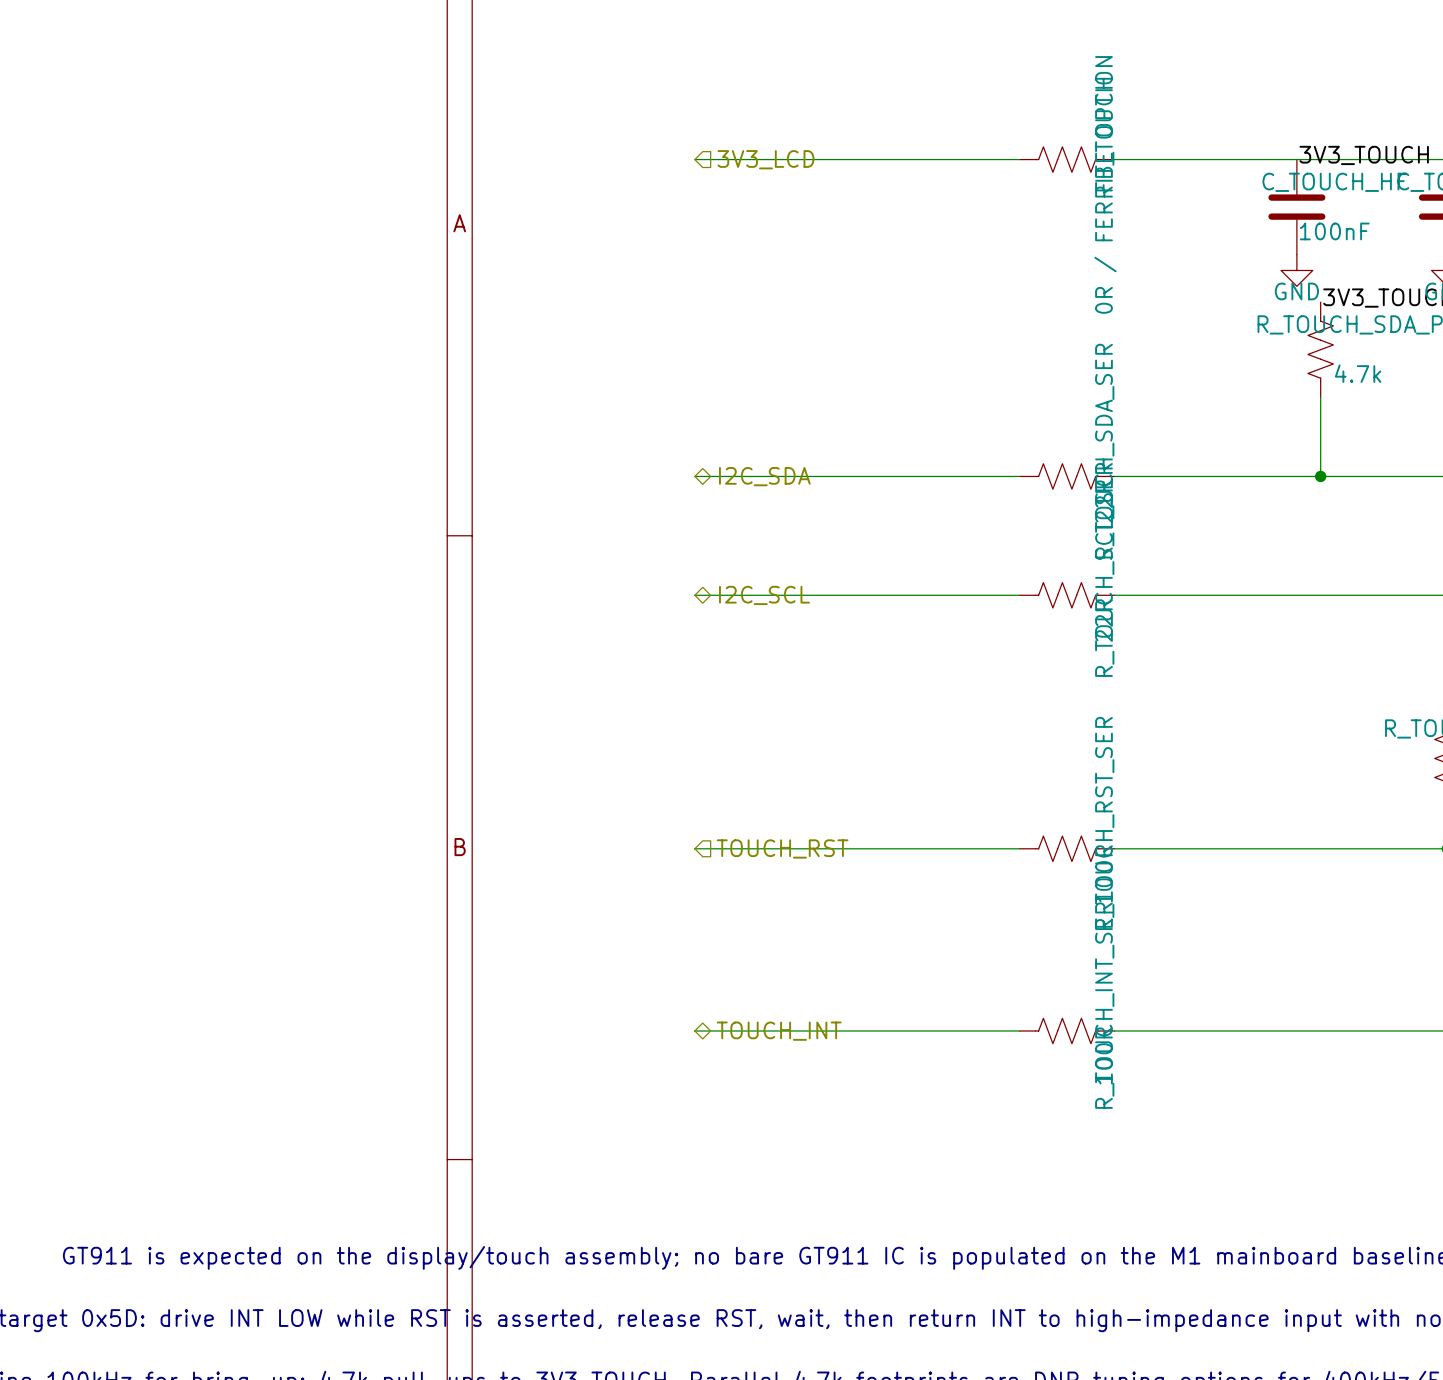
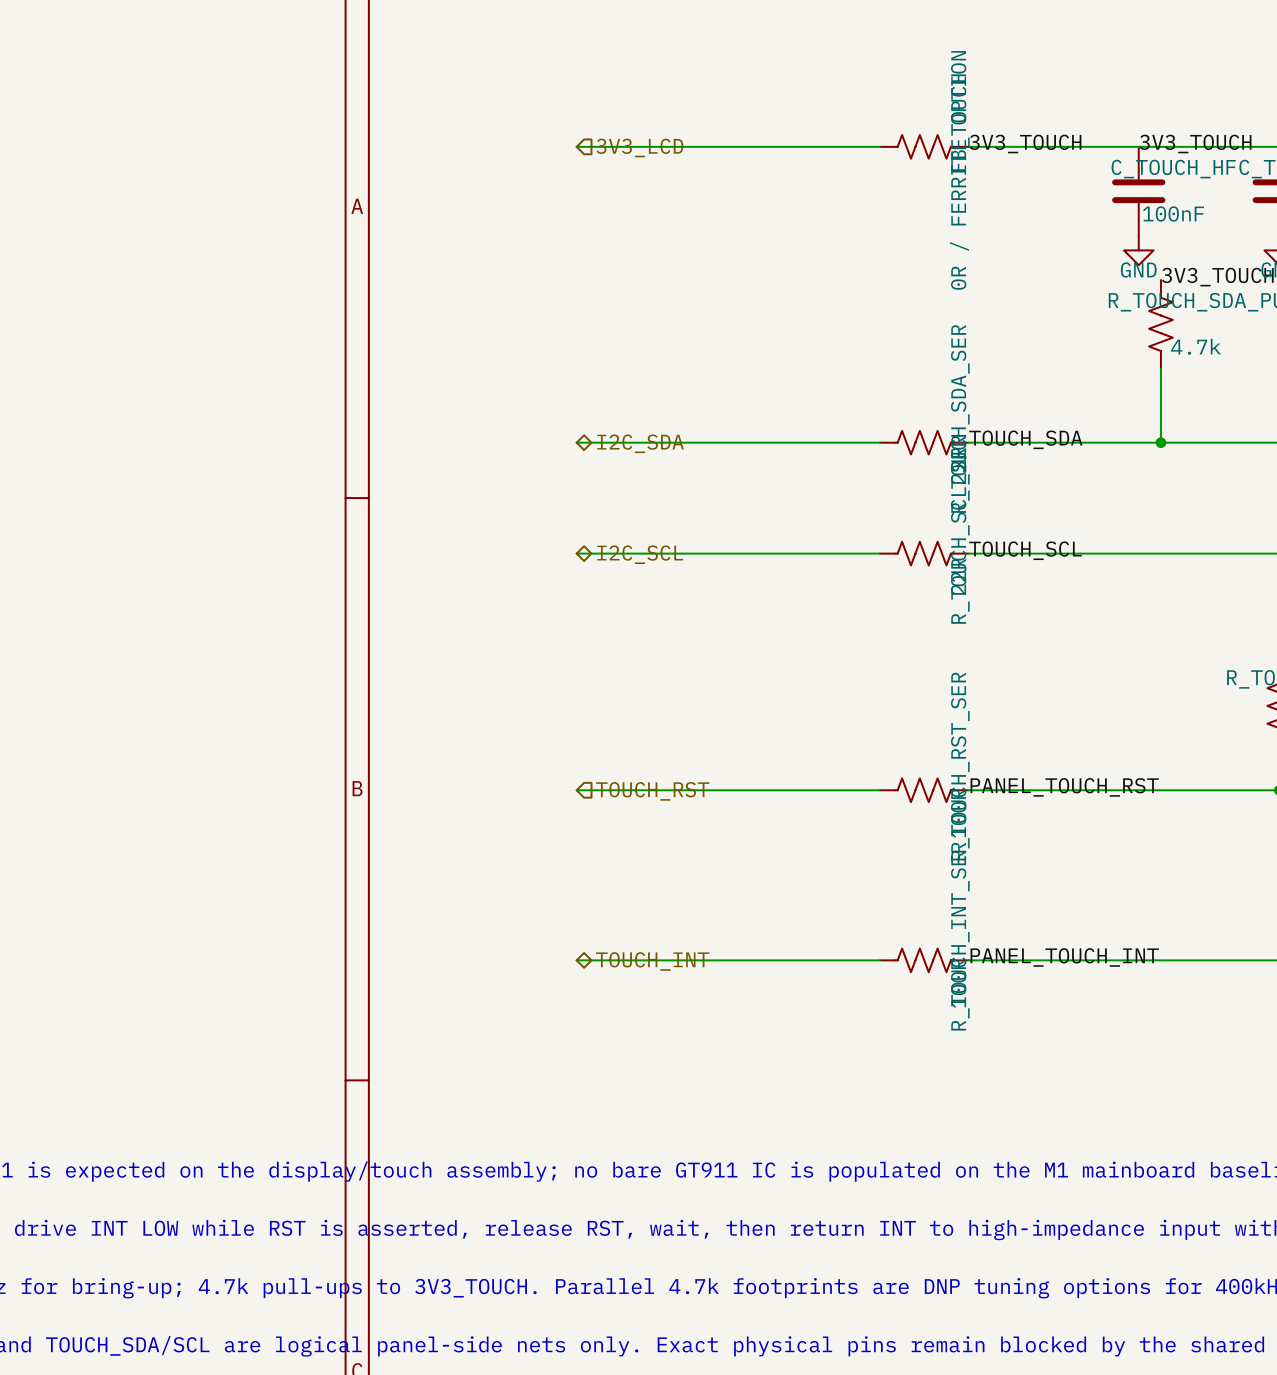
label: none -> 3V3_TOUCH (1025, 143)
label: none -> TOUCH_SDA (1025, 439)
label: none -> TOUCH_SCL (1025, 550)
label: none -> PANEL_TOUCH_RST (1064, 787)
label: none -> PANEL_TOUCH_INT (1064, 957)

